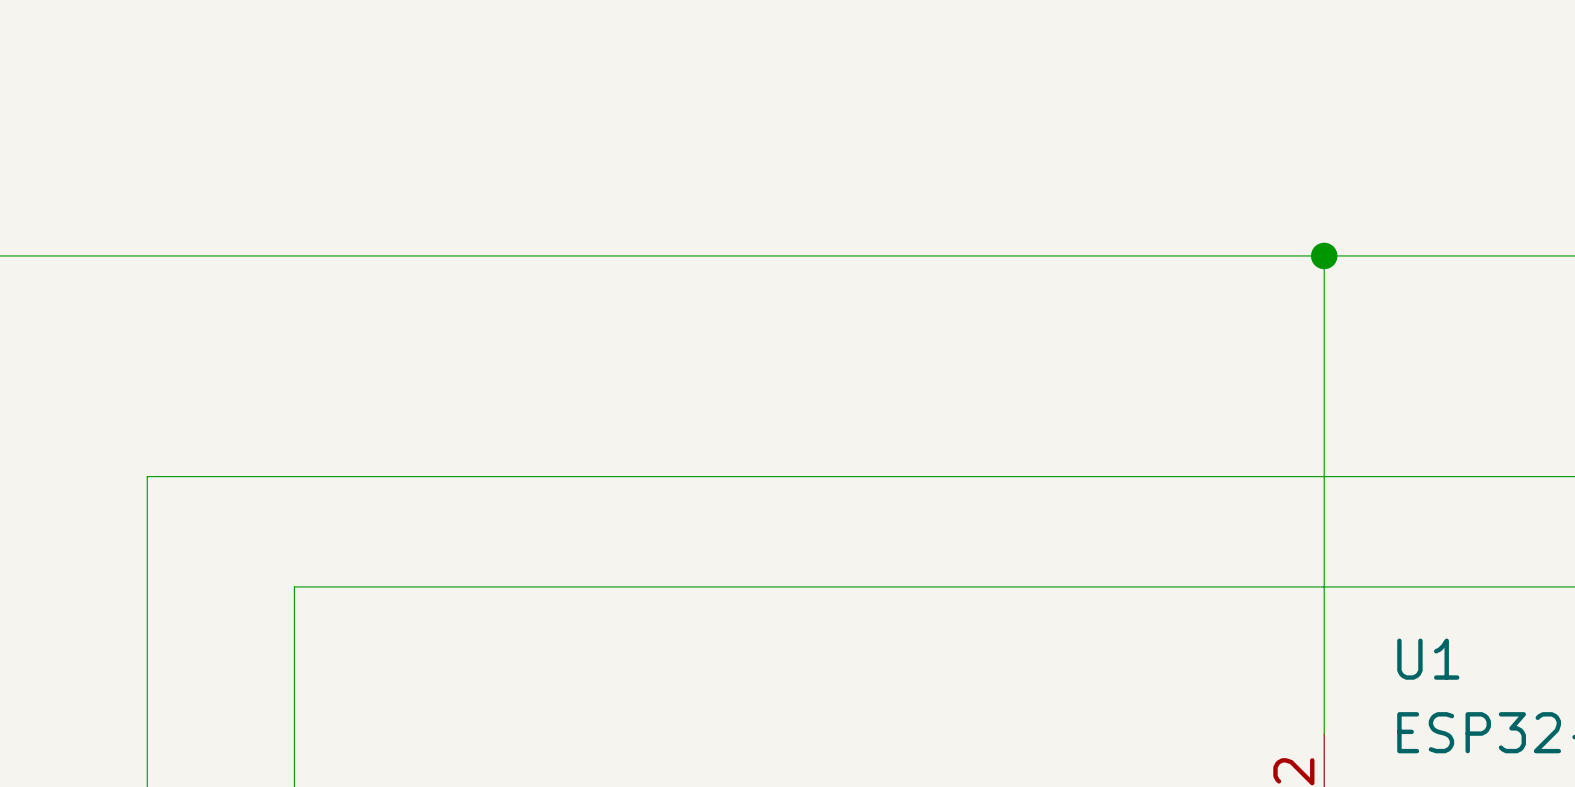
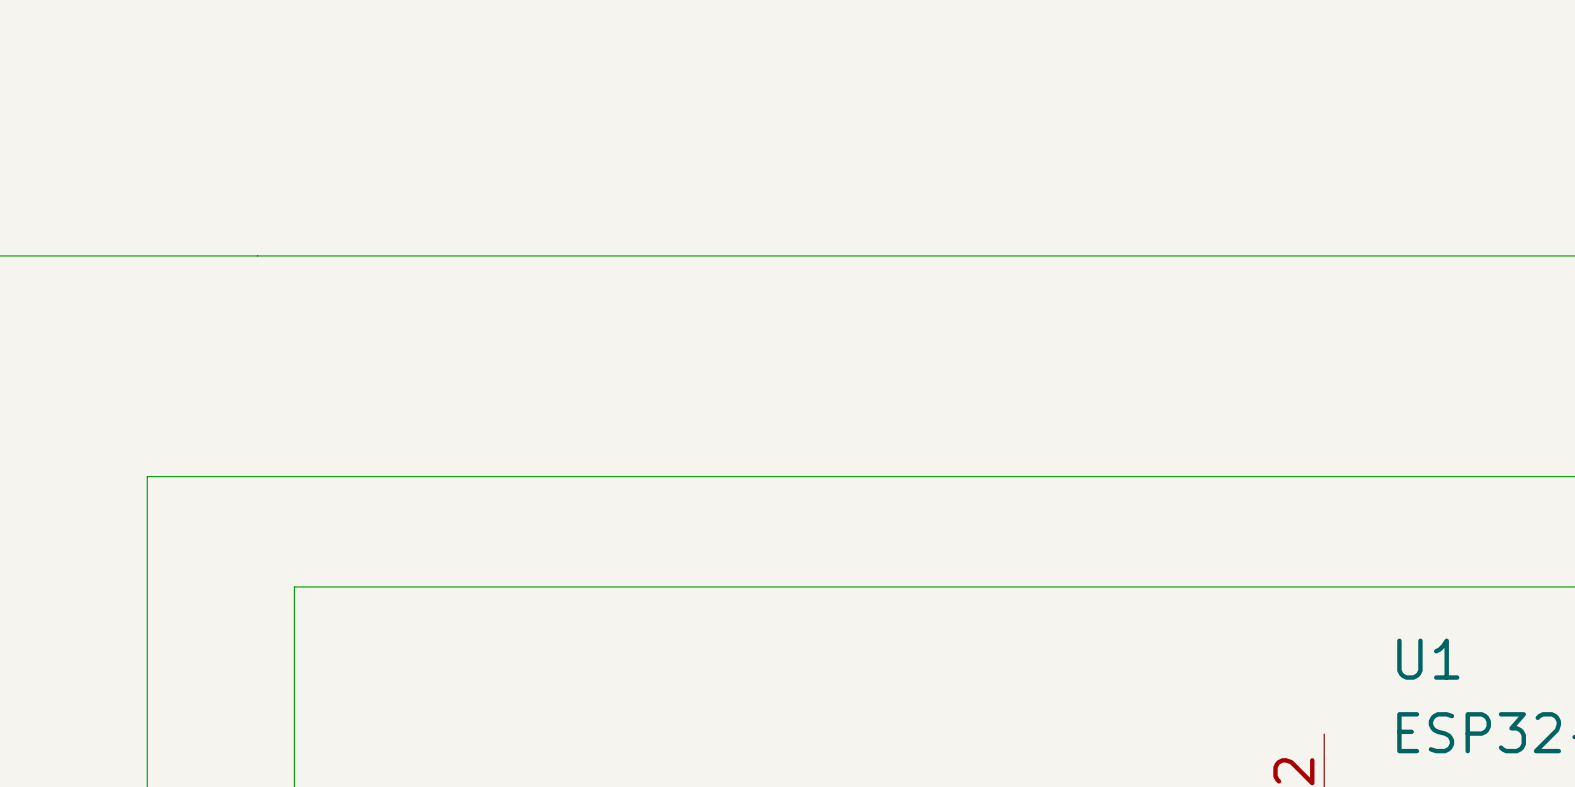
wire: (1324, 255) (1324, 734) -> none
junction: (1324, 255) -> none

